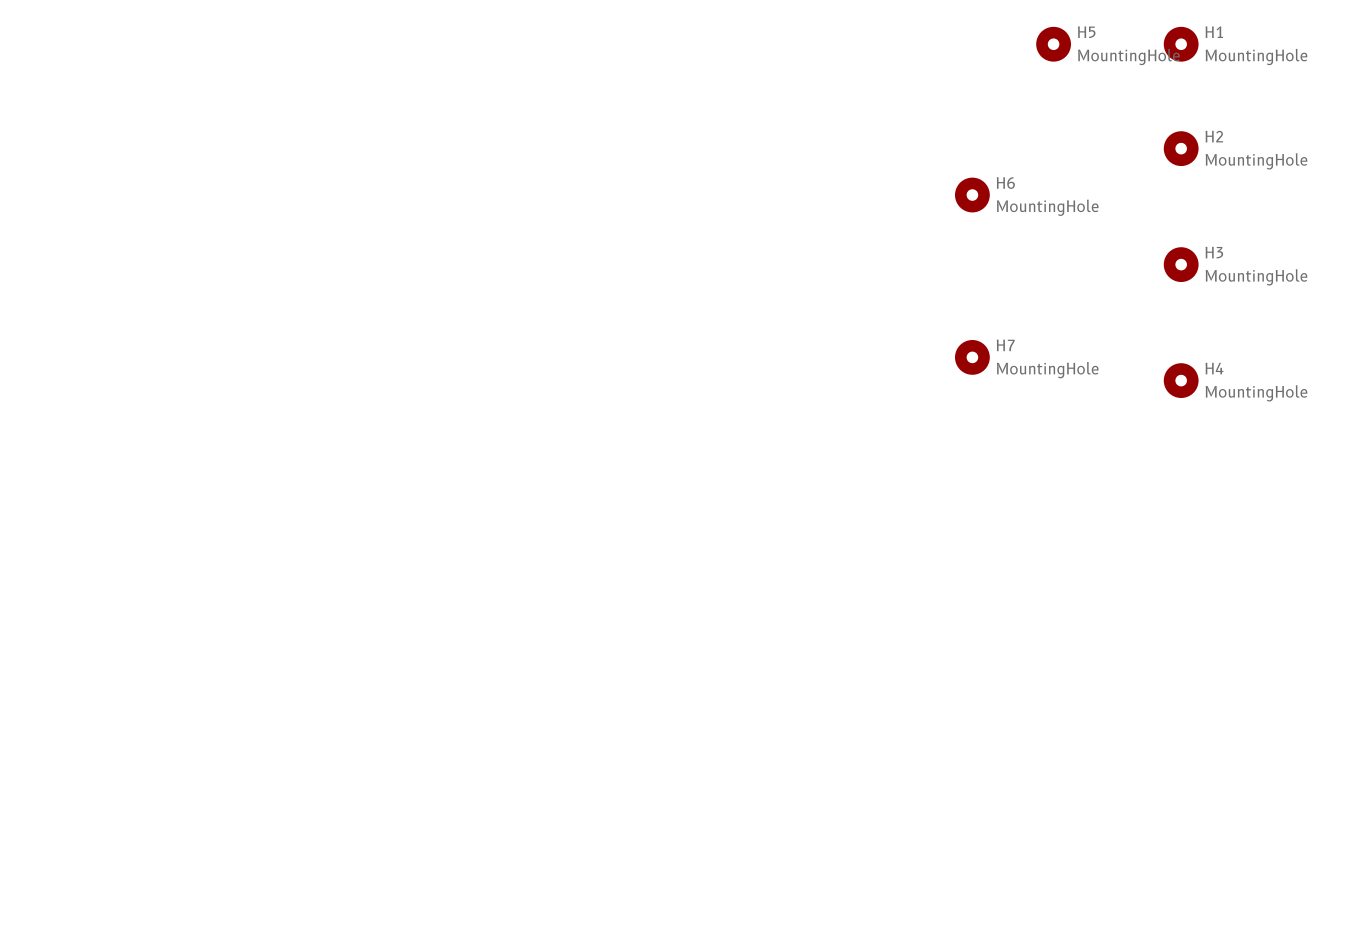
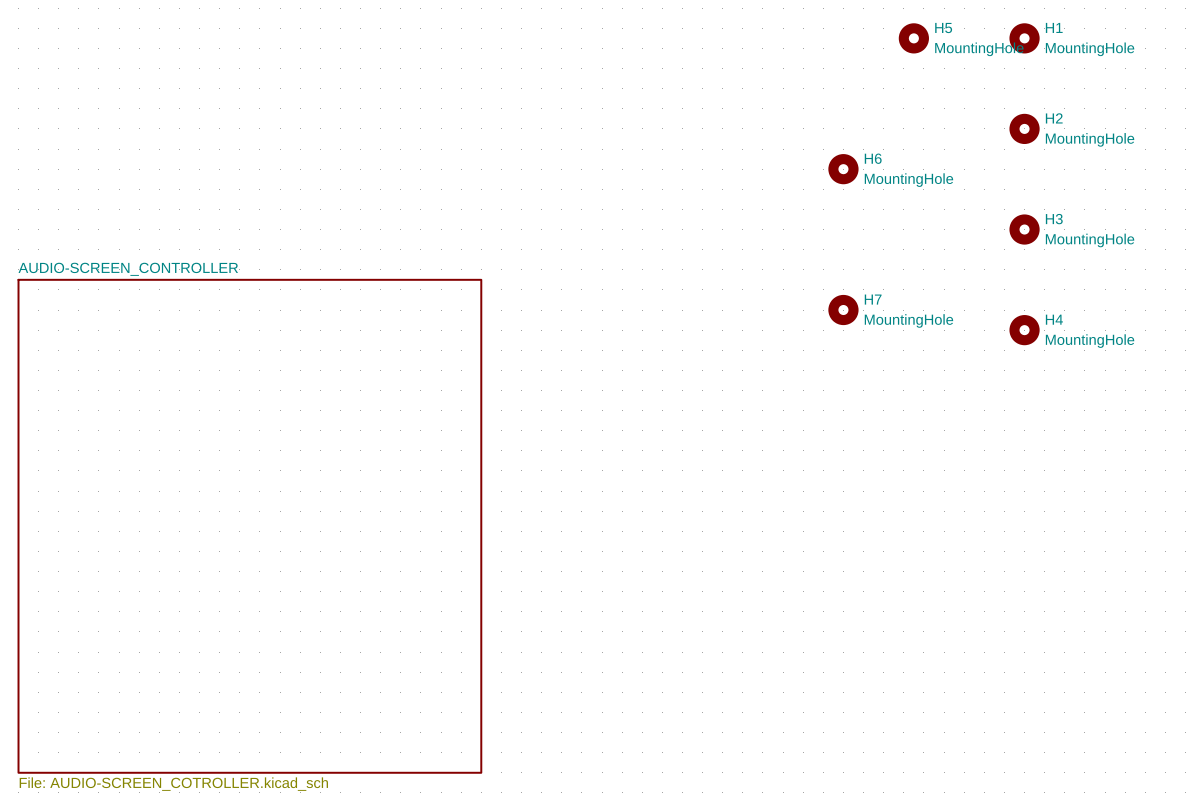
sheet AUDIO-SCREEN_CONTROLLER: none -> File: AUDIO-SCREEN_COTROLLER.kicad_sch (249, 526)

